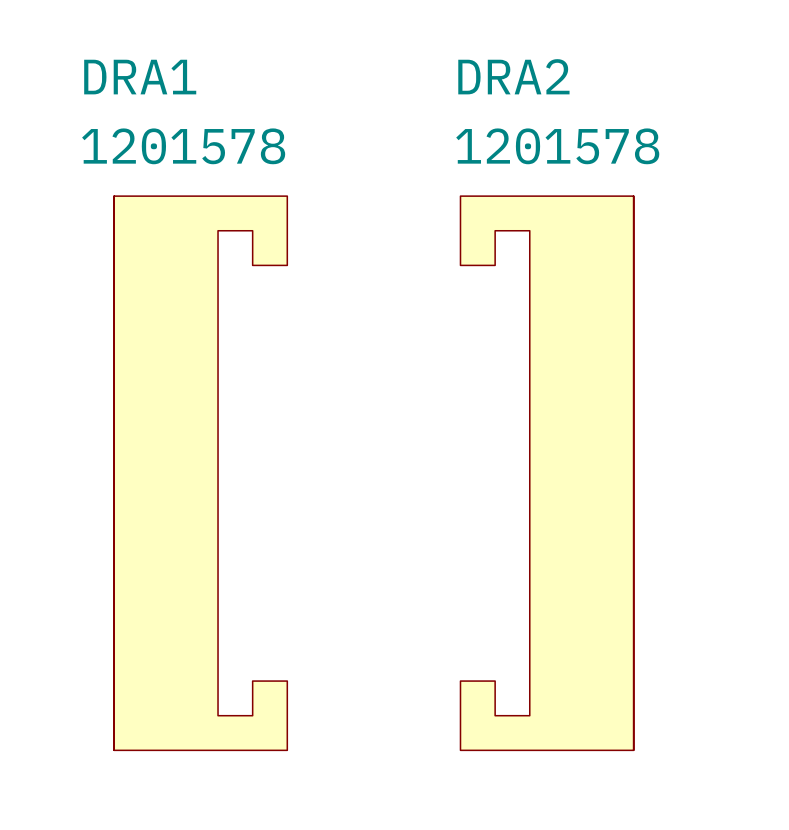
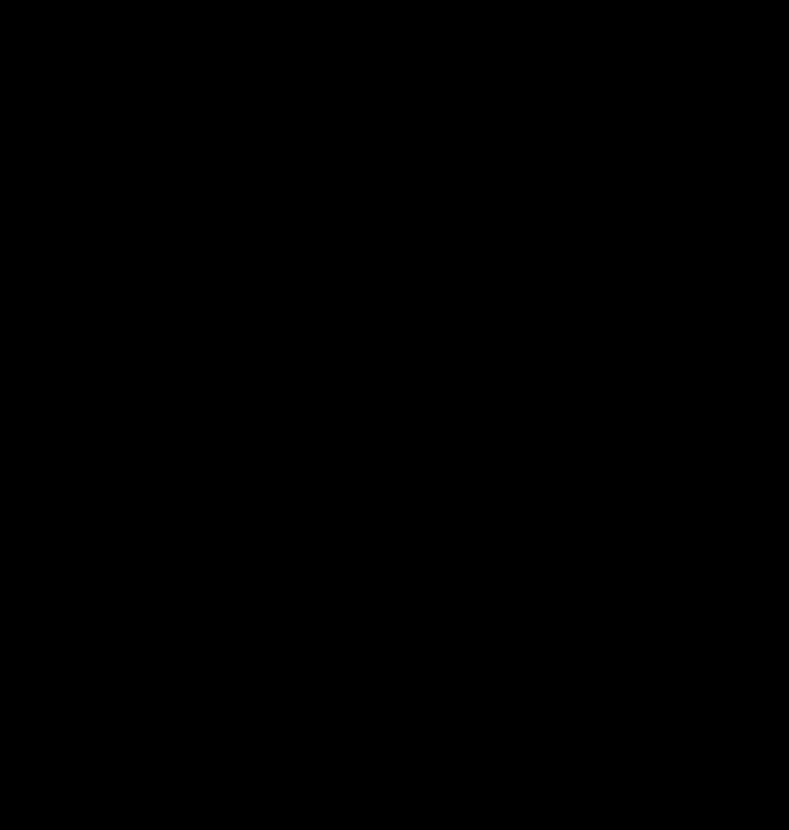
DRA1: 1201578 (200, 473) -> none
DRA2: 1201578 (547, 473) -> none

